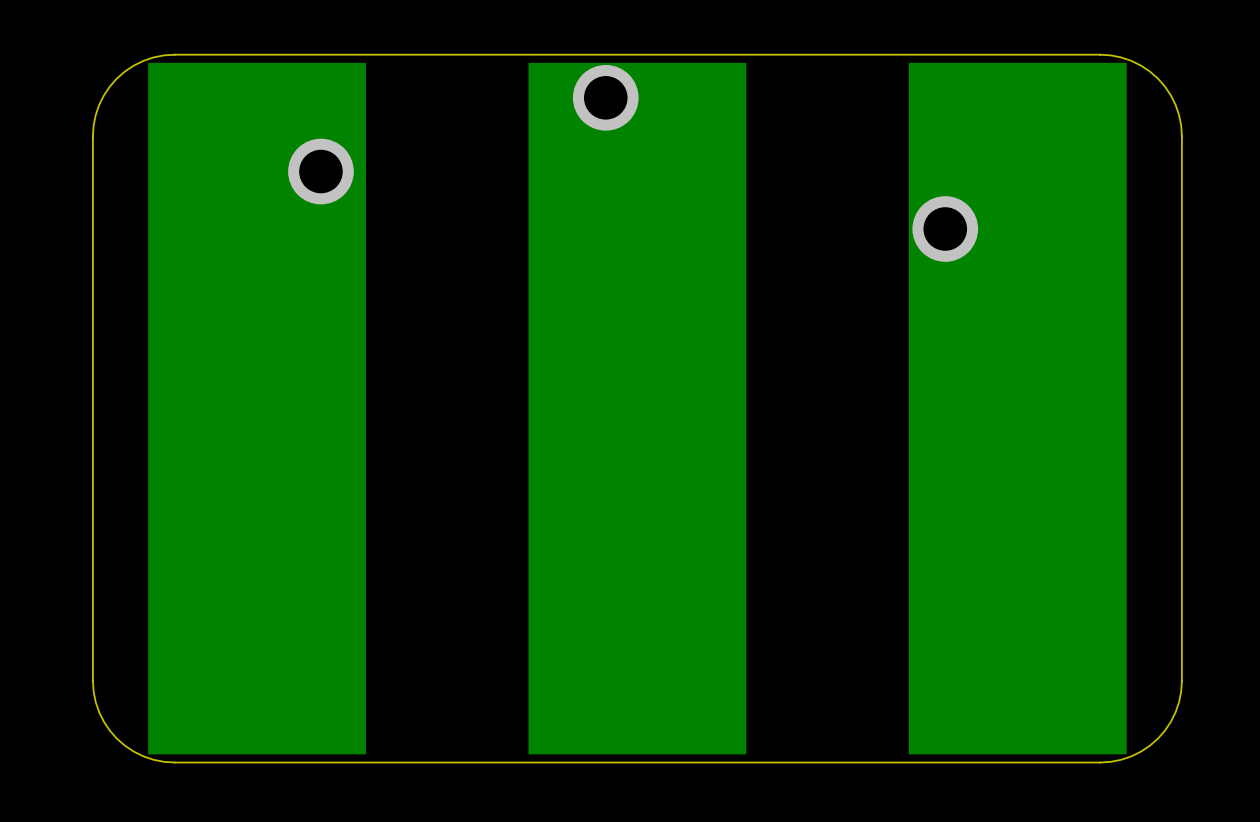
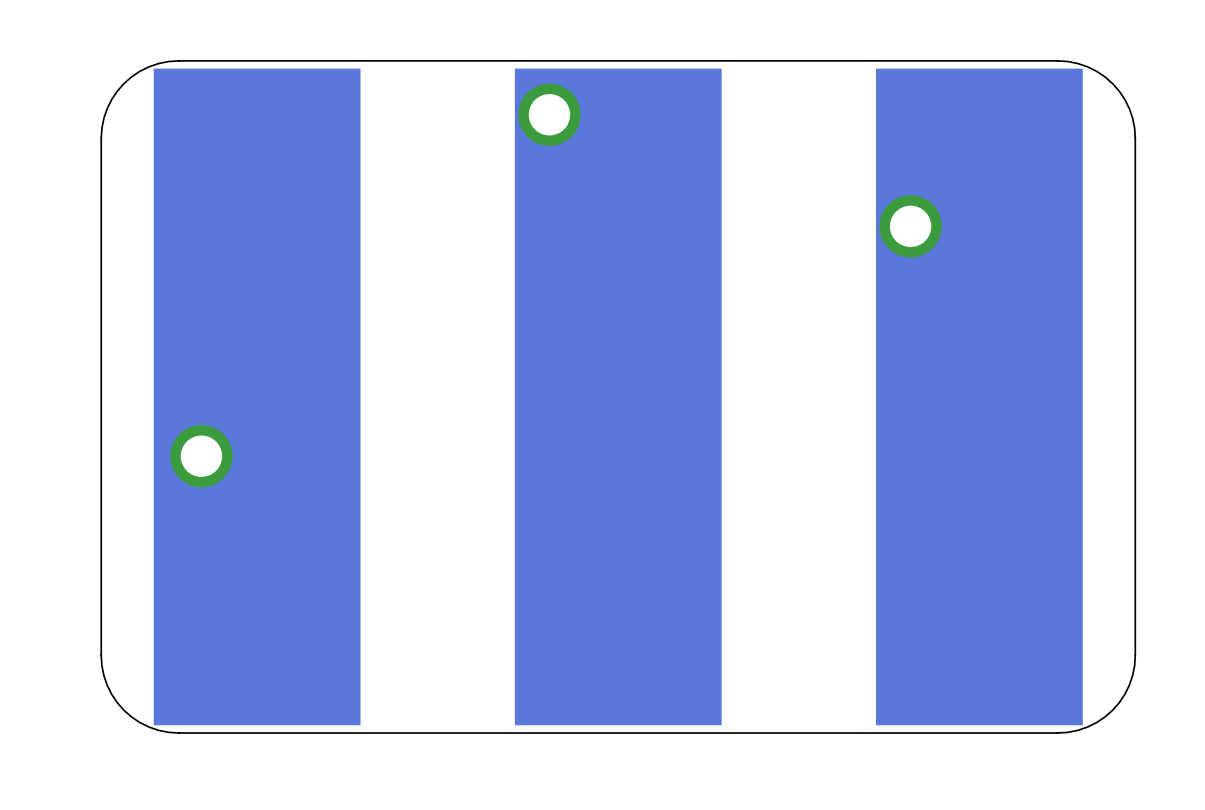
via position: (605, 97) -> (549, 114)
via: (320, 171) -> none
via: none -> (201, 456)

